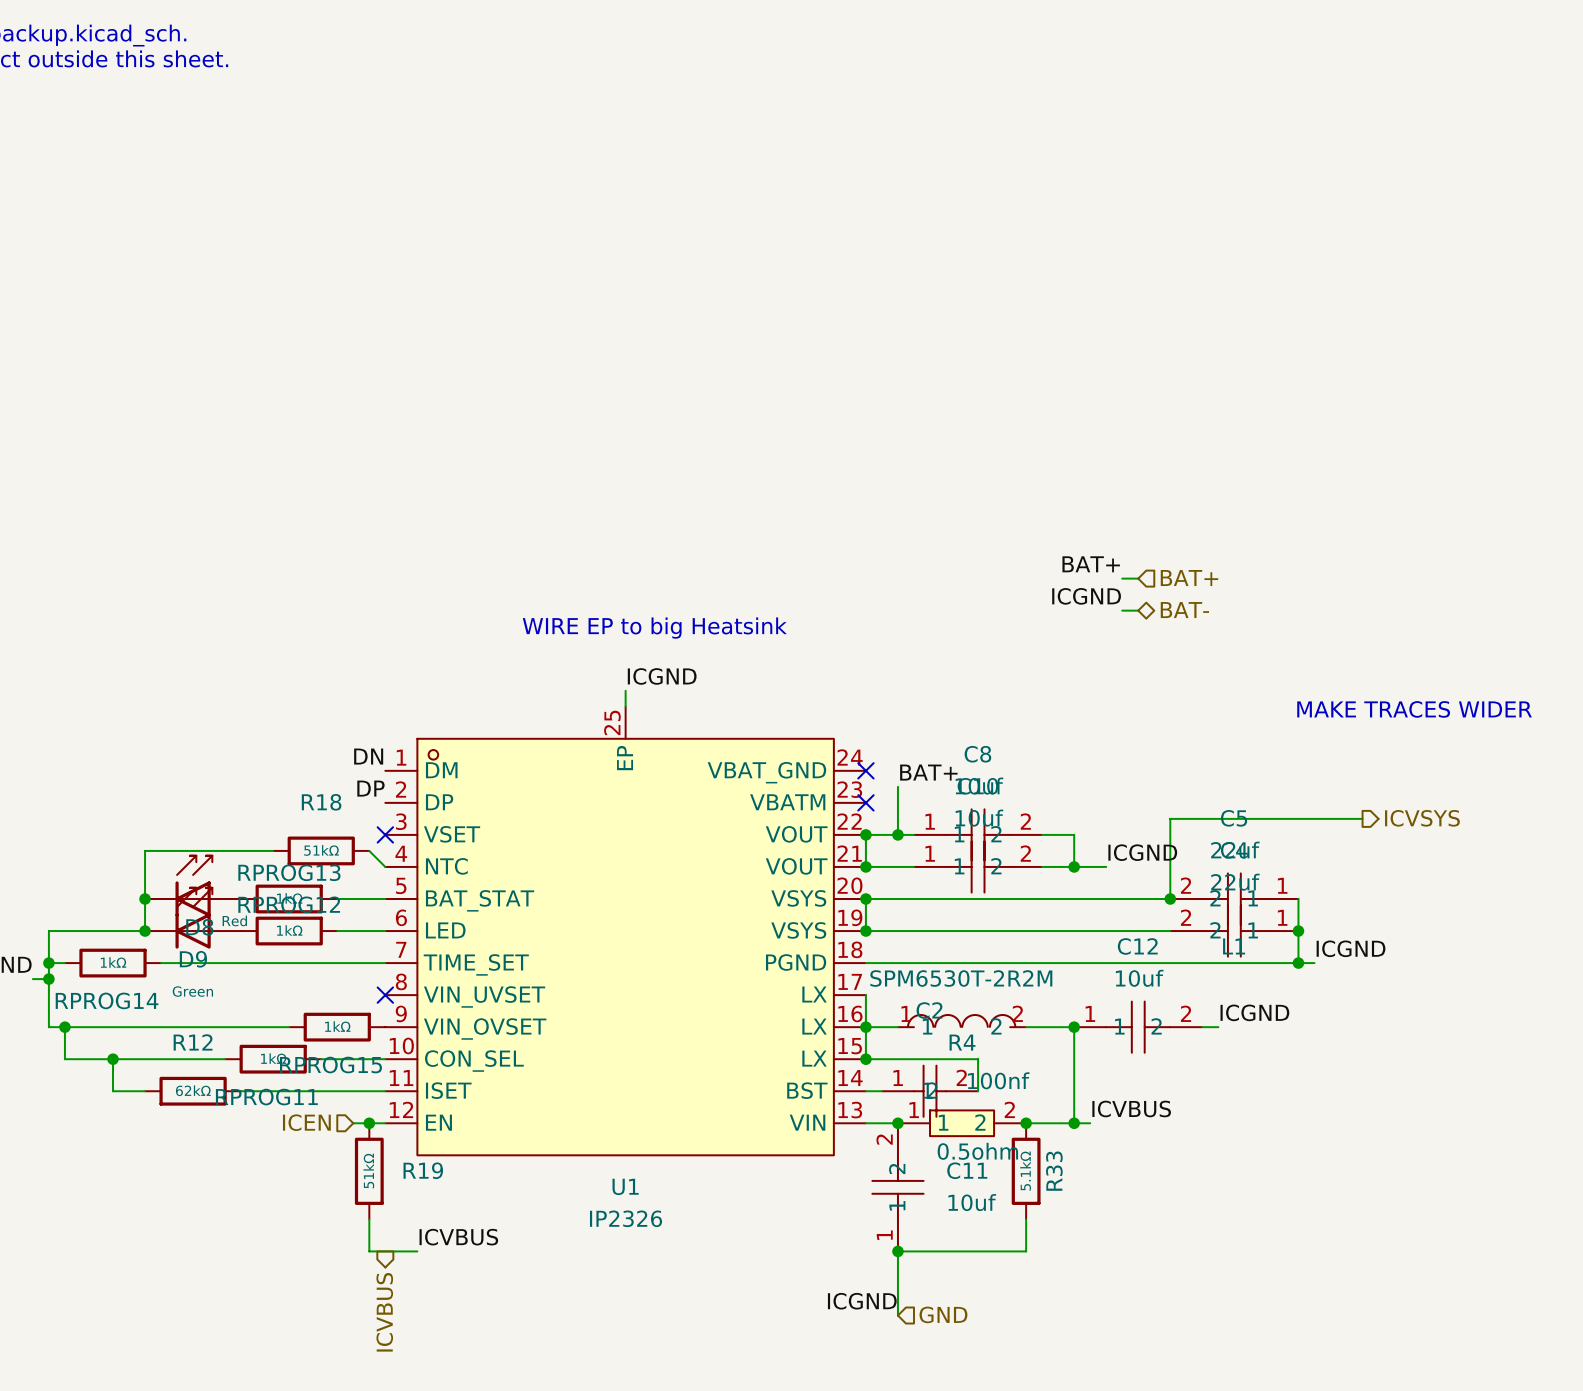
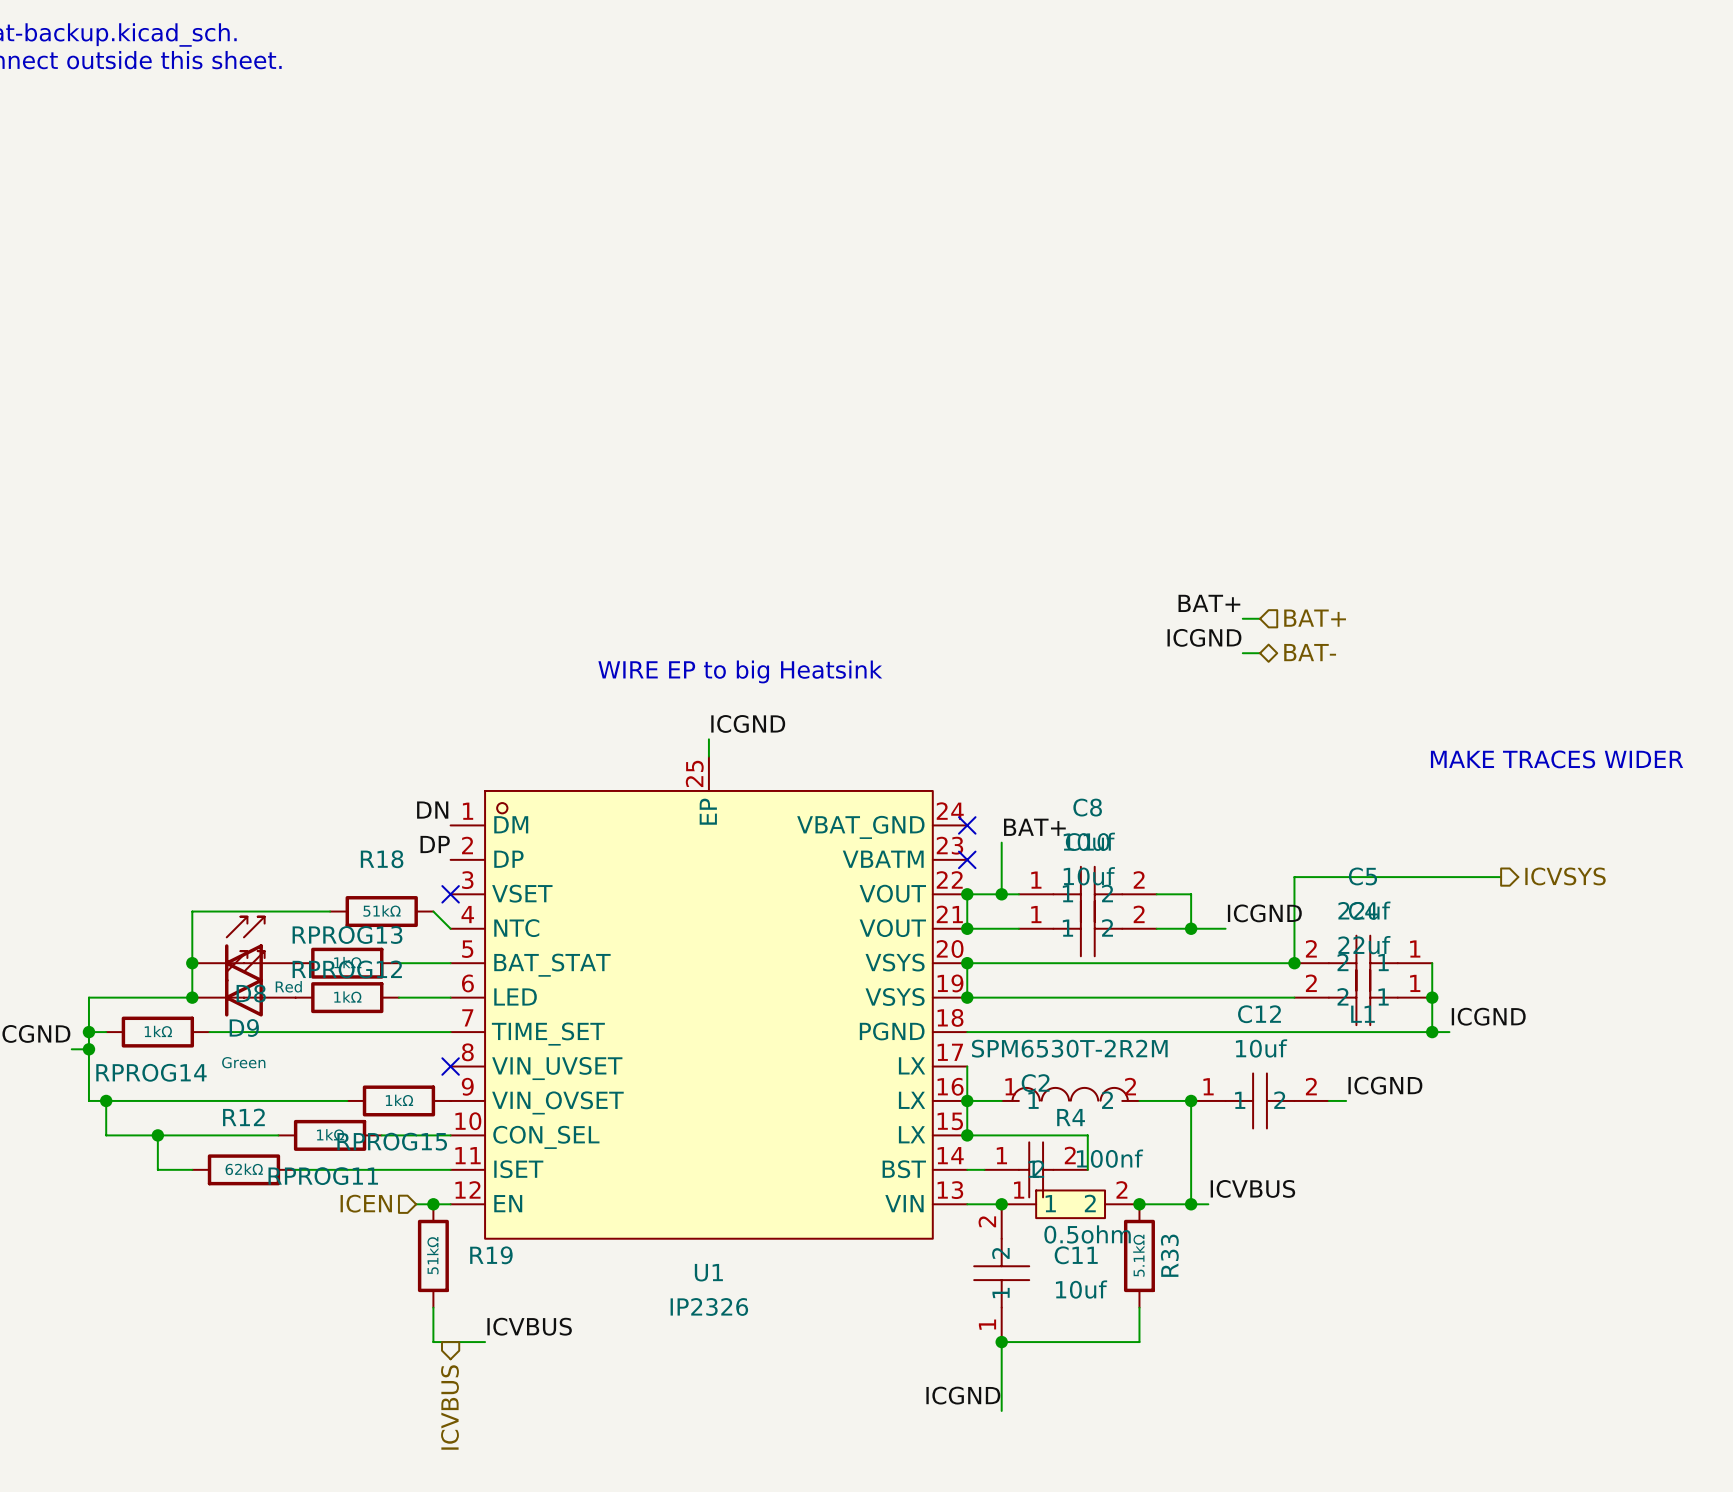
hierarchical label: GND (943, 1314) -> none

